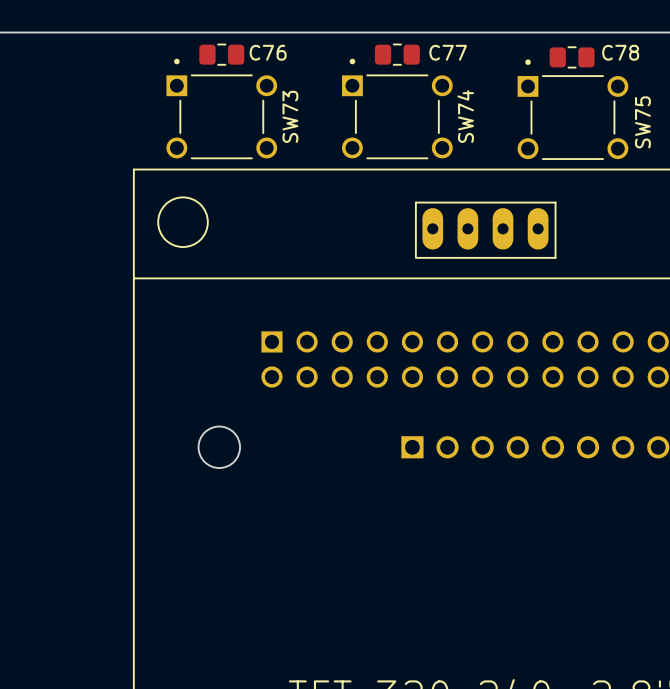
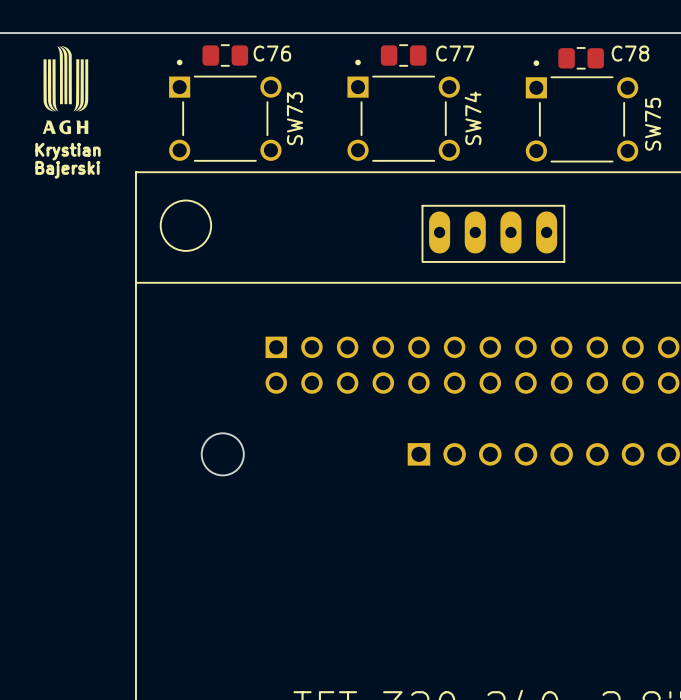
drawing: none -> [42, 46, 89, 135]
text: none -> Krystian (68, 151)
text: none -> Bajerski (67, 169)

